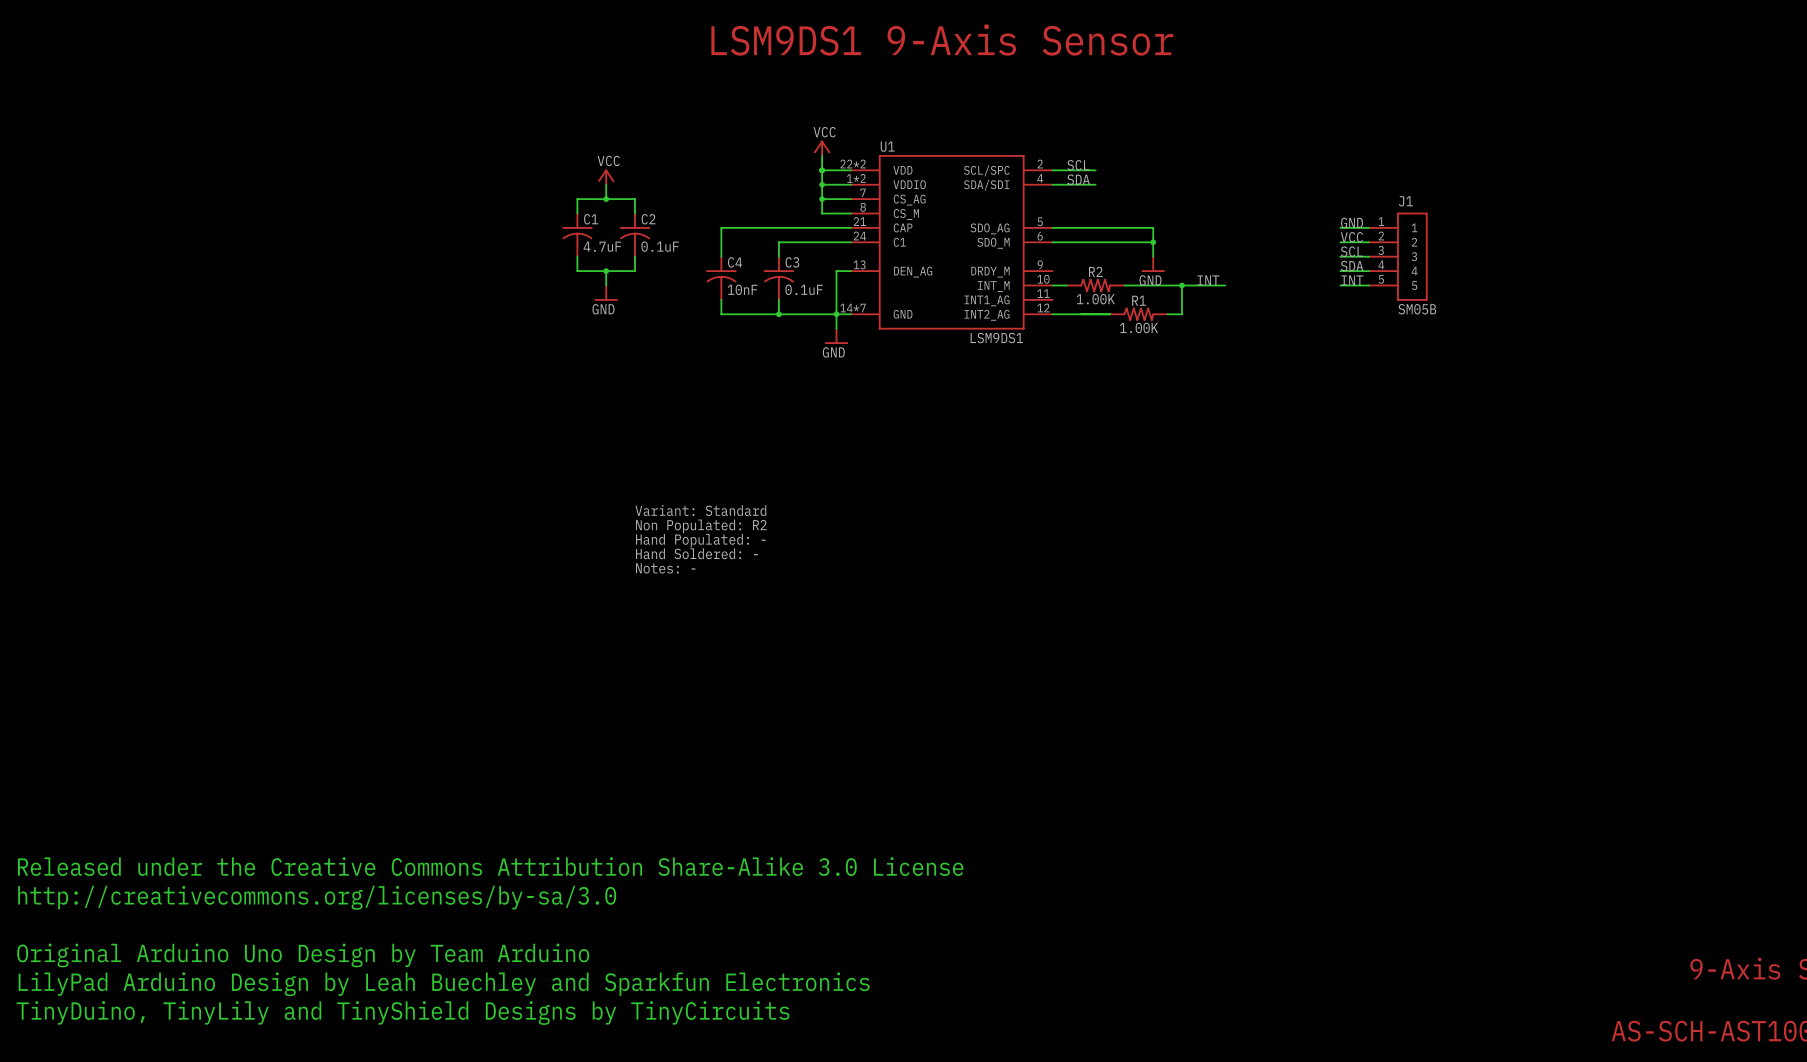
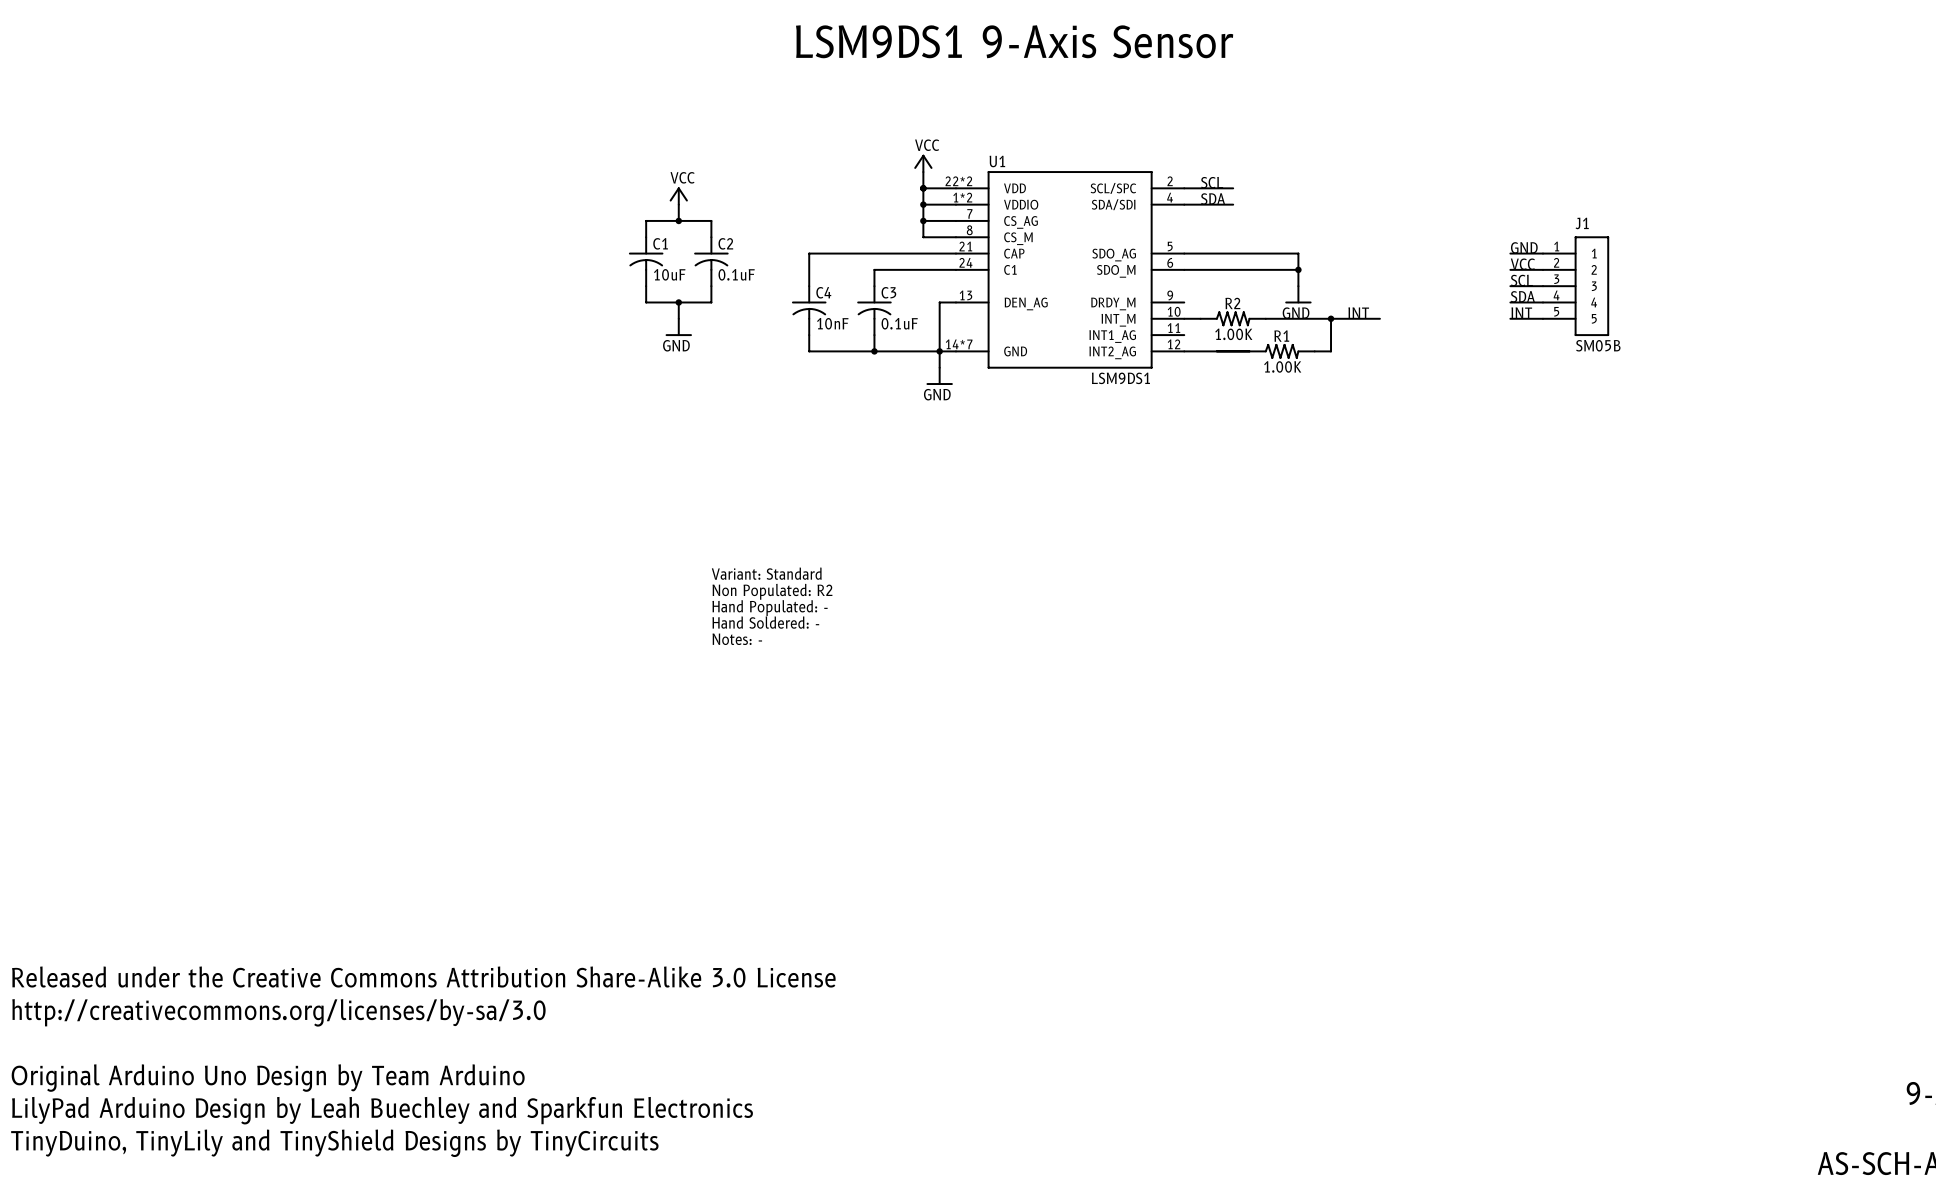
C1 value: 4.7uF (602, 246) -> 10uF (669, 274)

